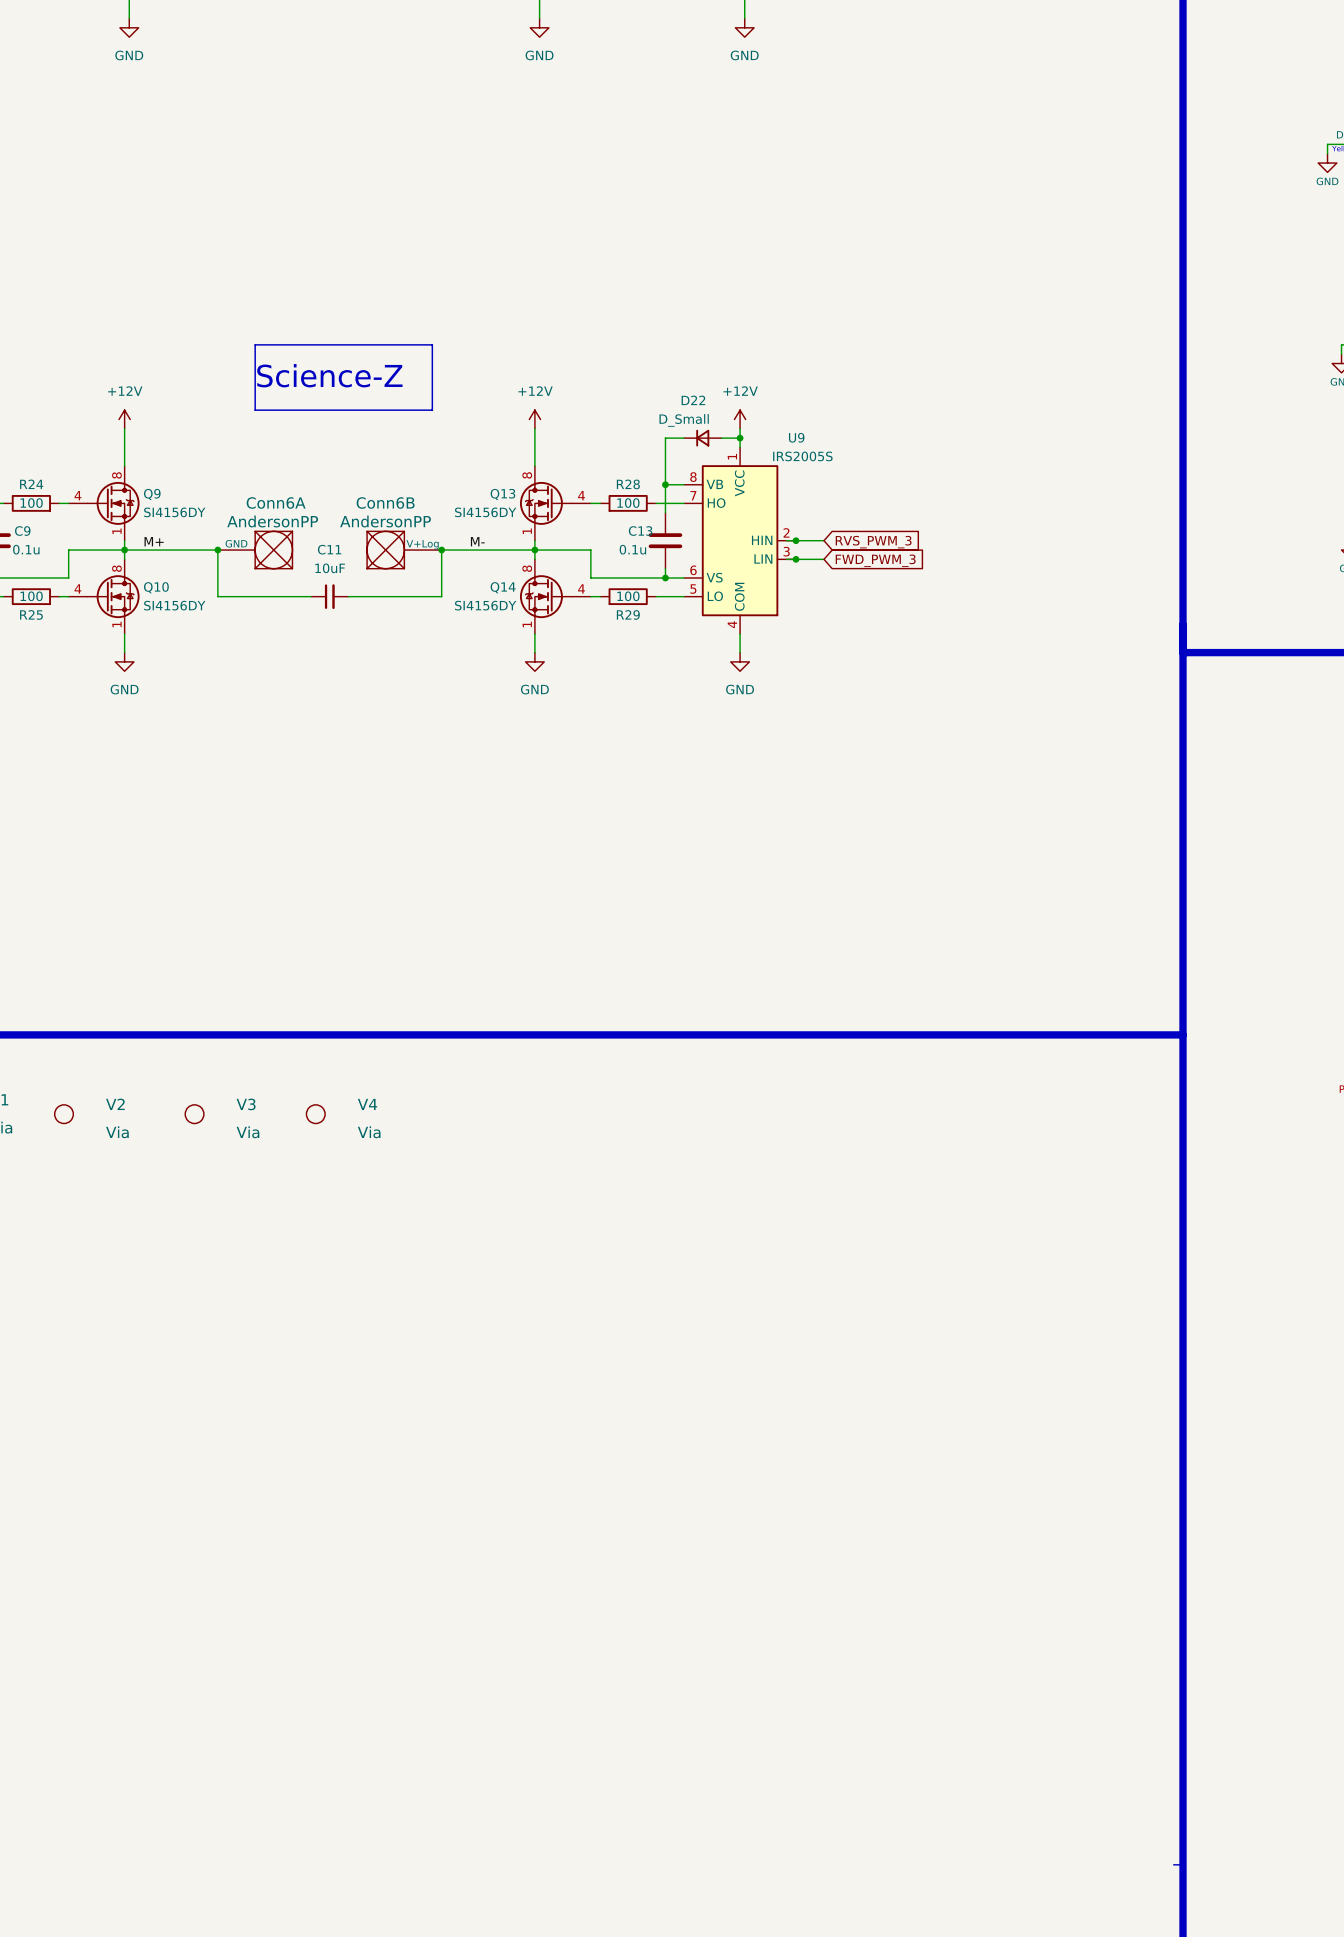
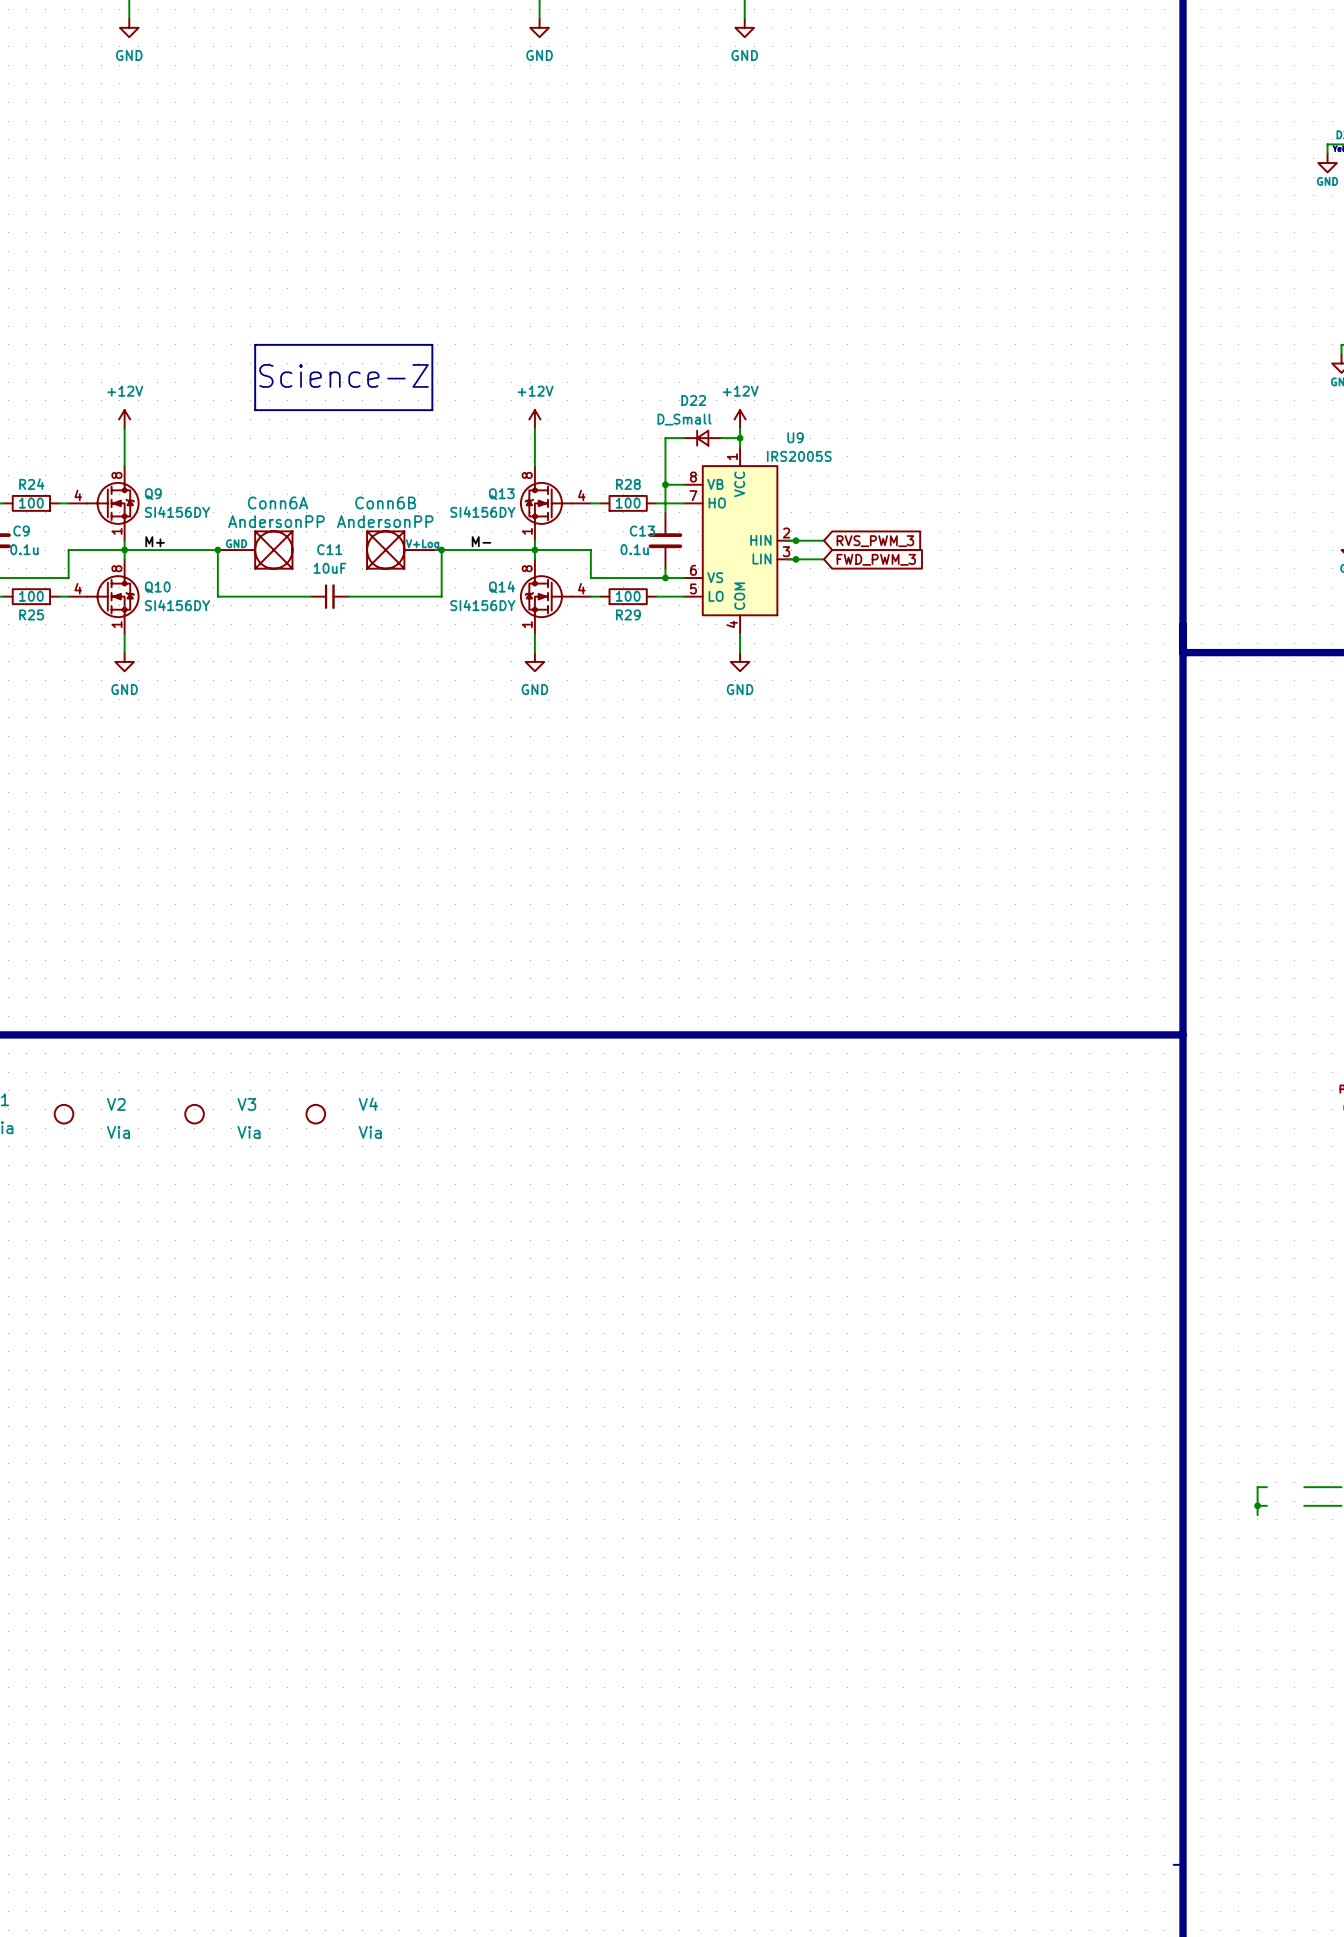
wire: none -> (1266, 1487) (1257, 1487) (1257, 1515)
wire: none -> (1304, 1487) (1341, 1487)
wire: none -> (1257, 1505) (1266, 1505)
junction: none -> (1257, 1505)
wire: none -> (1304, 1505) (1341, 1505)

